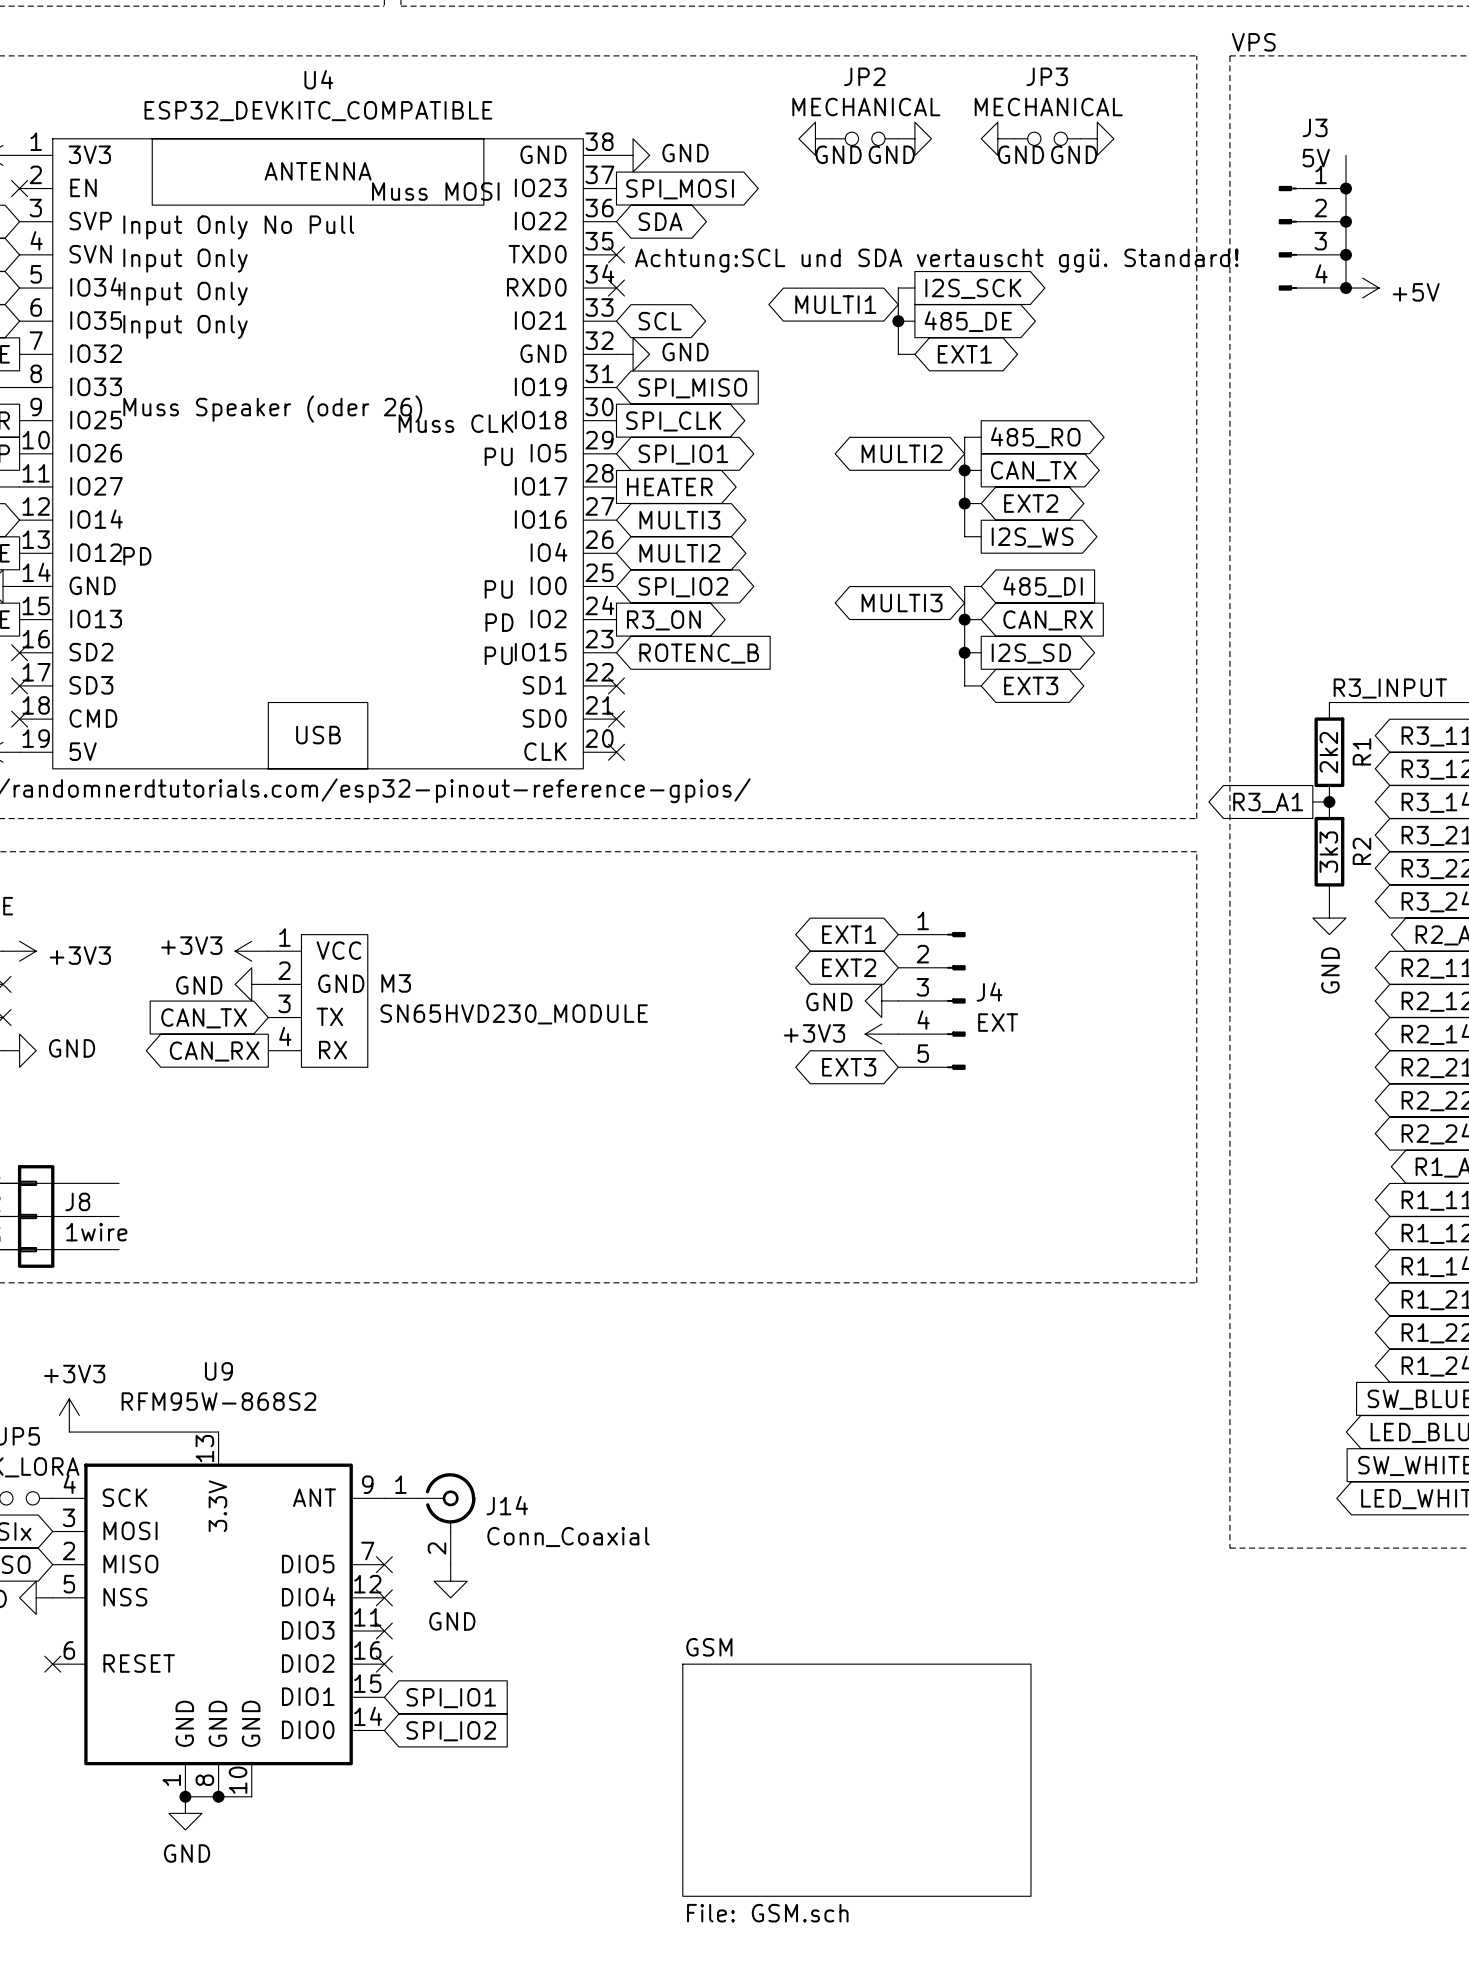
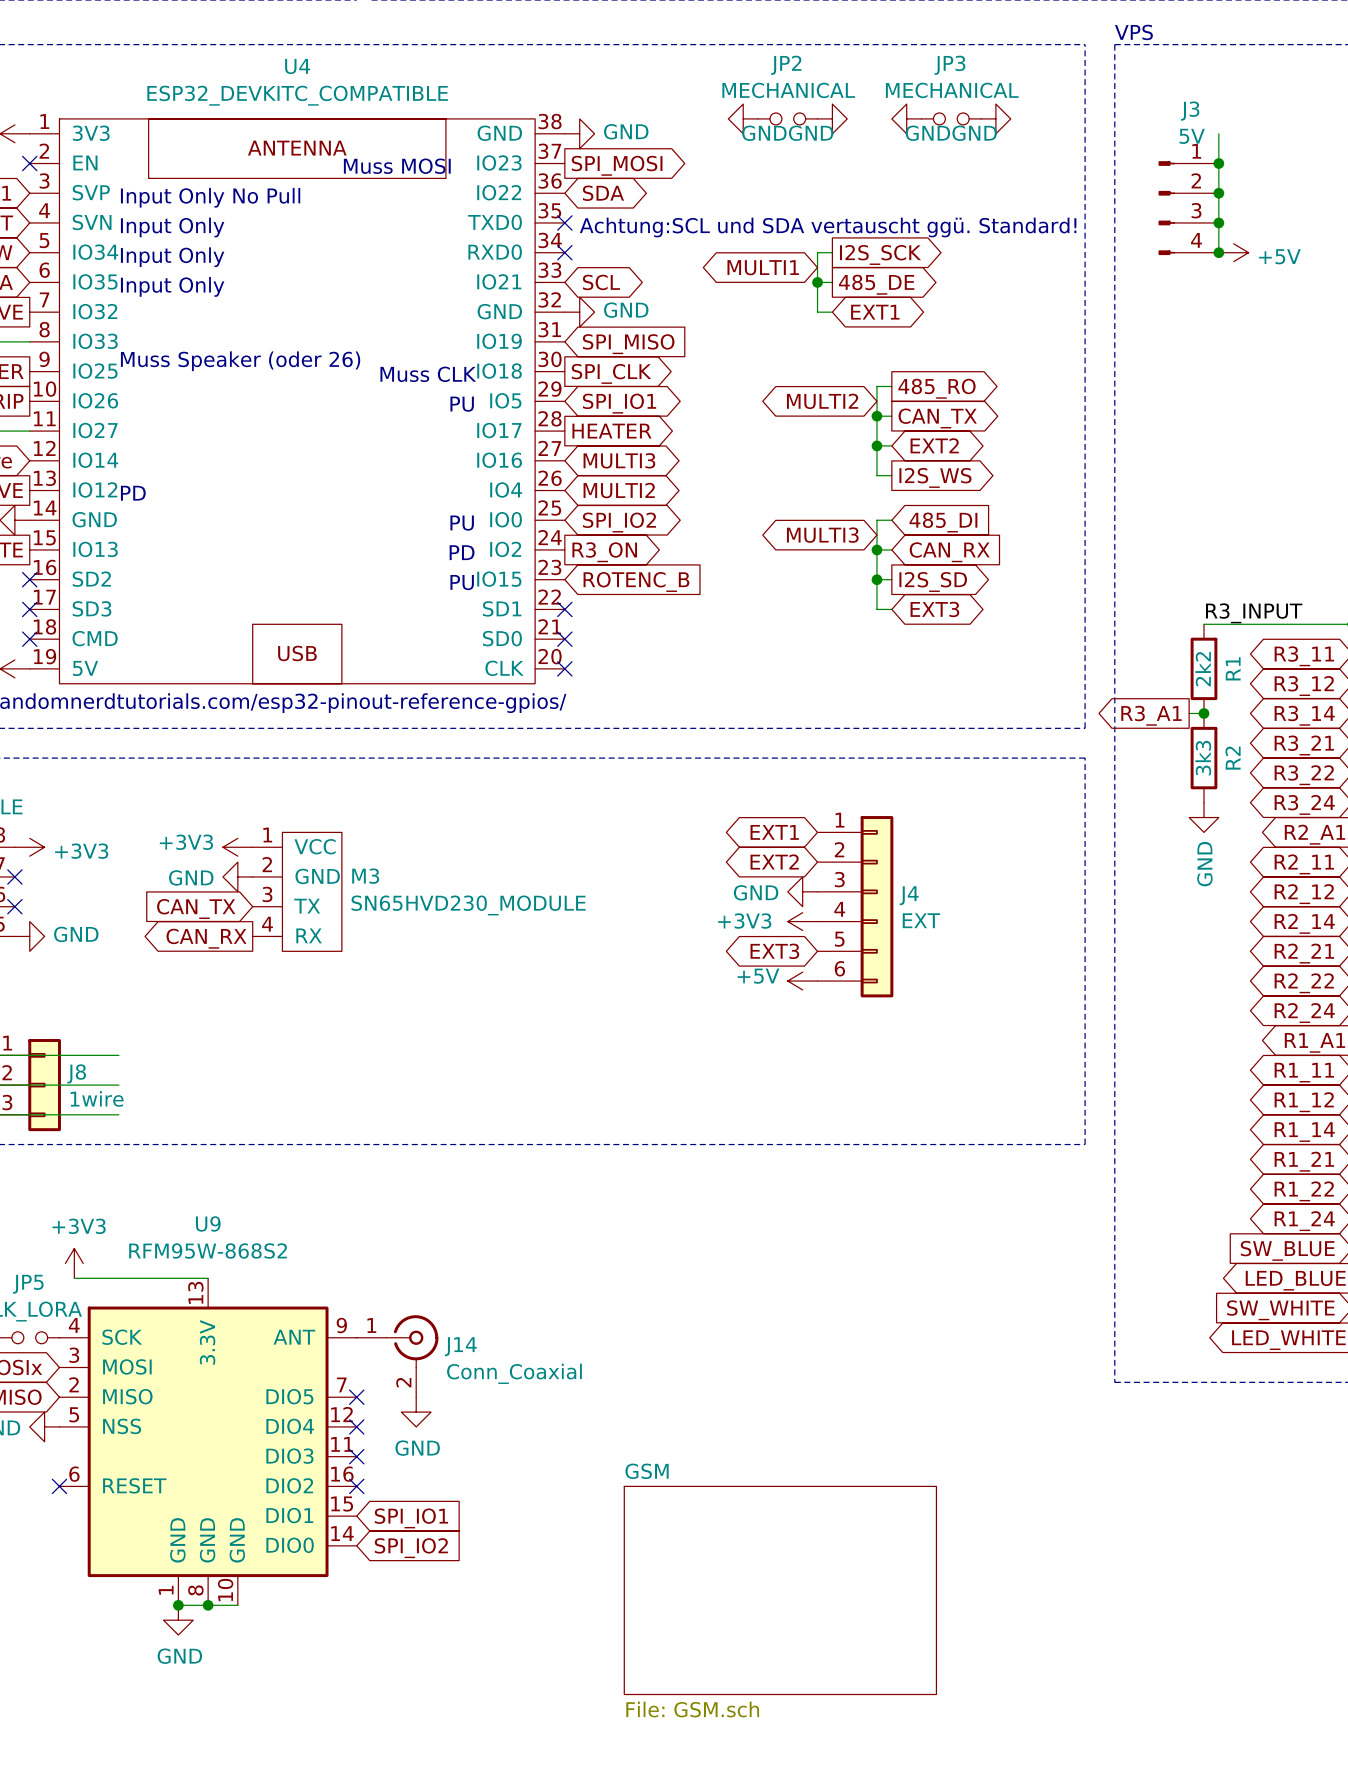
J4 symbol: [898, 931, 966, 1070] -> [817, 816, 894, 998]
power symbol: none -> +5V (802, 981)

